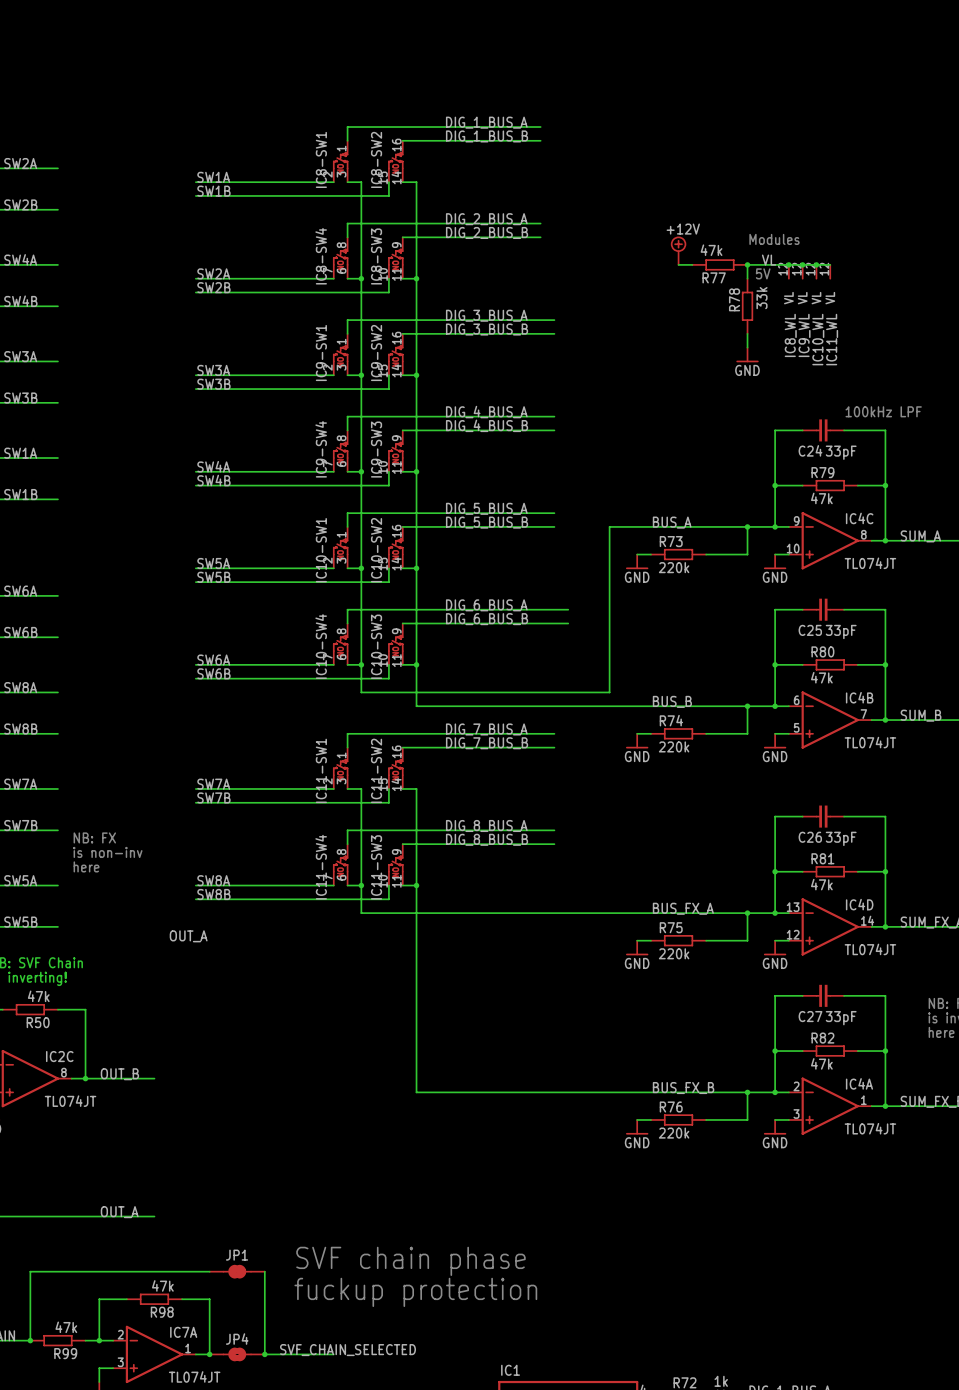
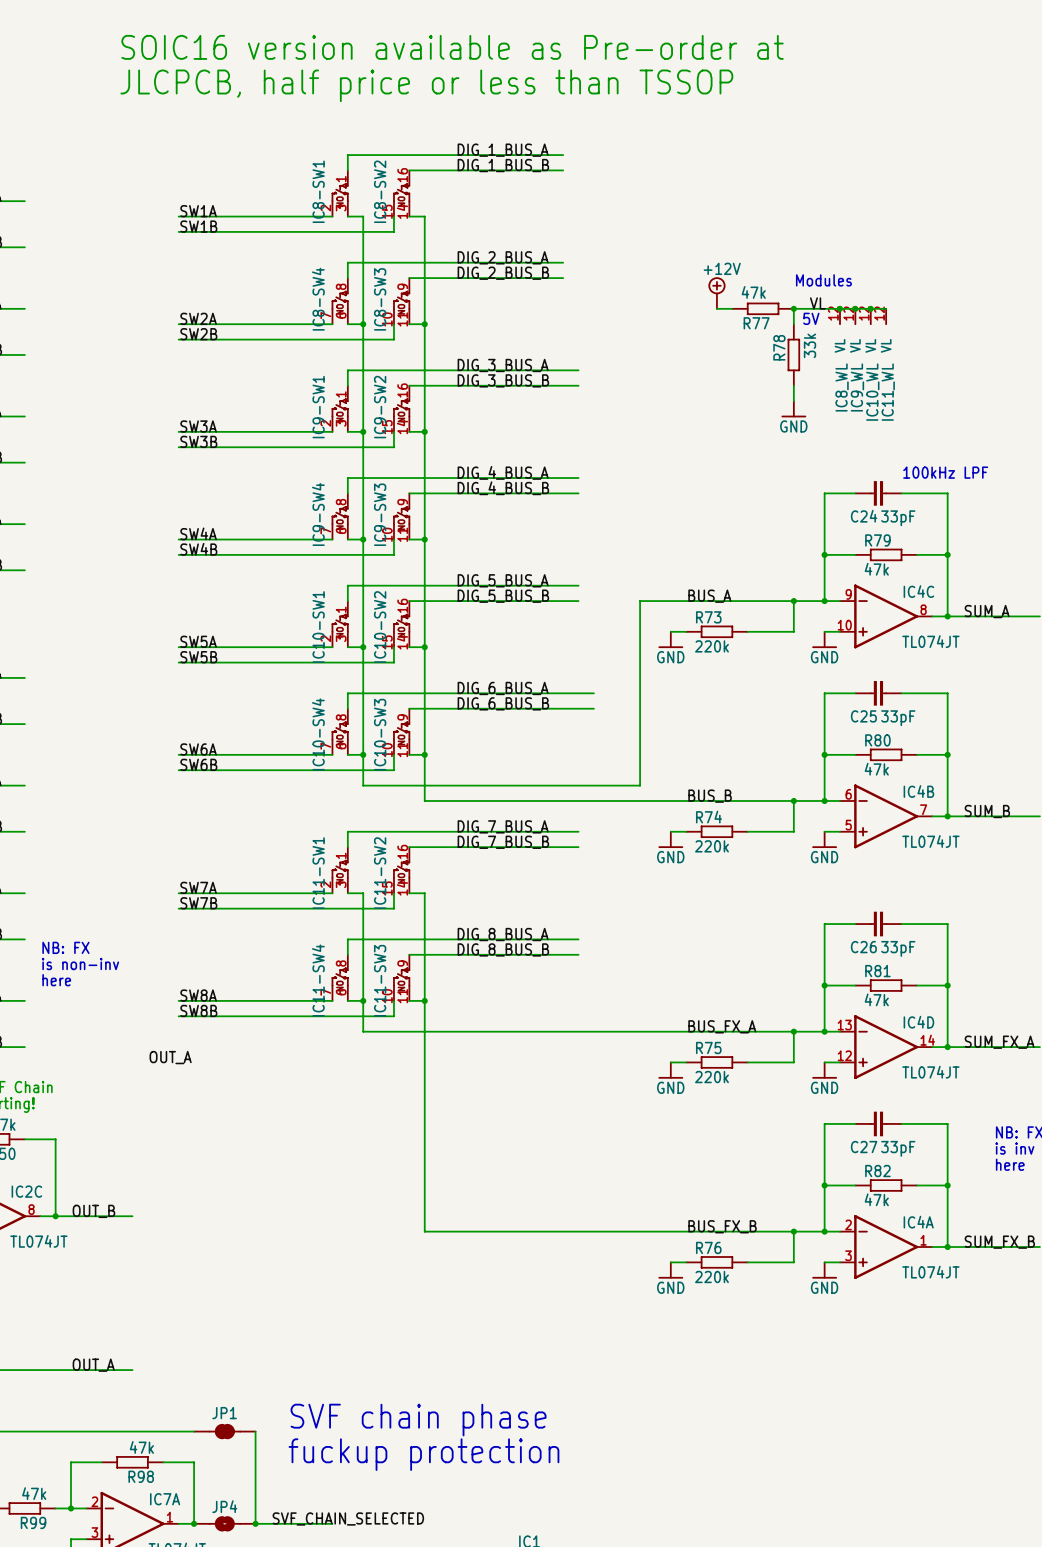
text: none -> SOIC16 version available as Pre-order at (452, 47)
text: none -> JLCPCB, half price or less than TSSOP (426, 85)

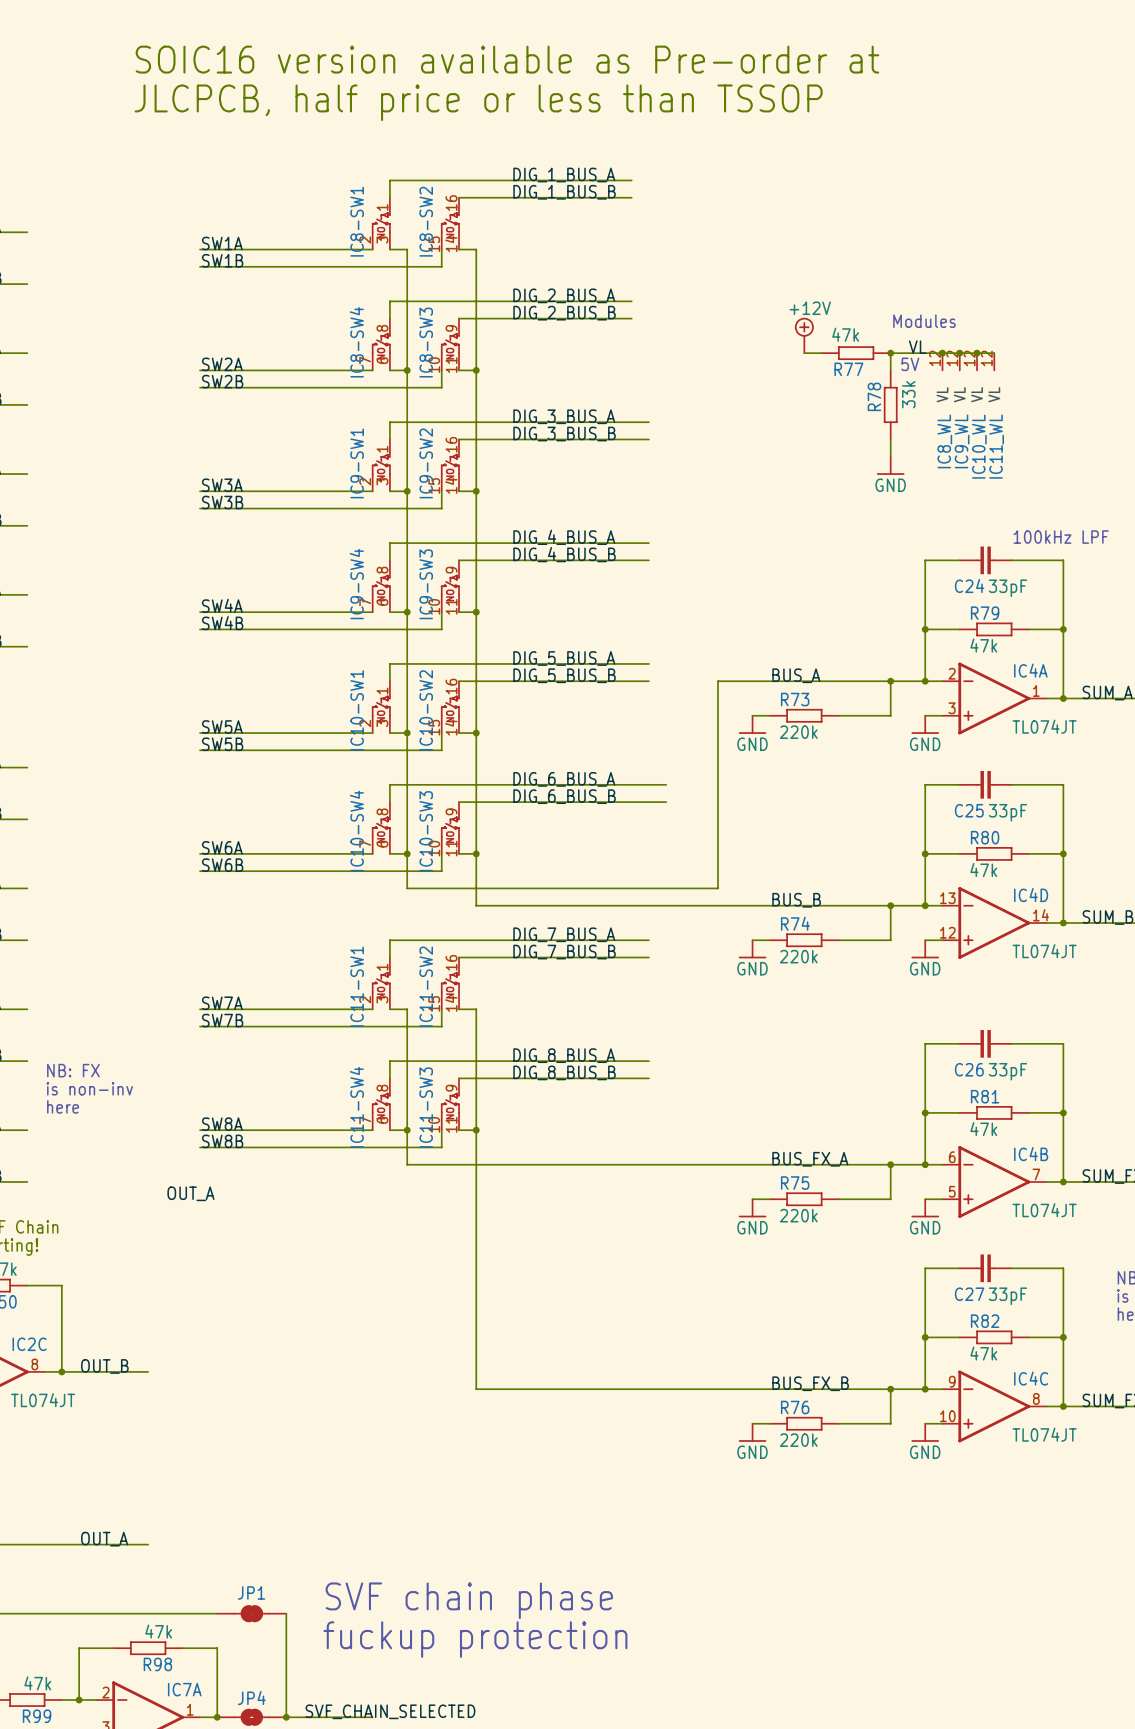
IC4C position: (886, 616) -> (994, 1406)
IC4B position: (886, 816) -> (994, 1181)
IC4D position: (886, 1047) -> (994, 922)
IC4A position: (886, 1247) -> (994, 698)

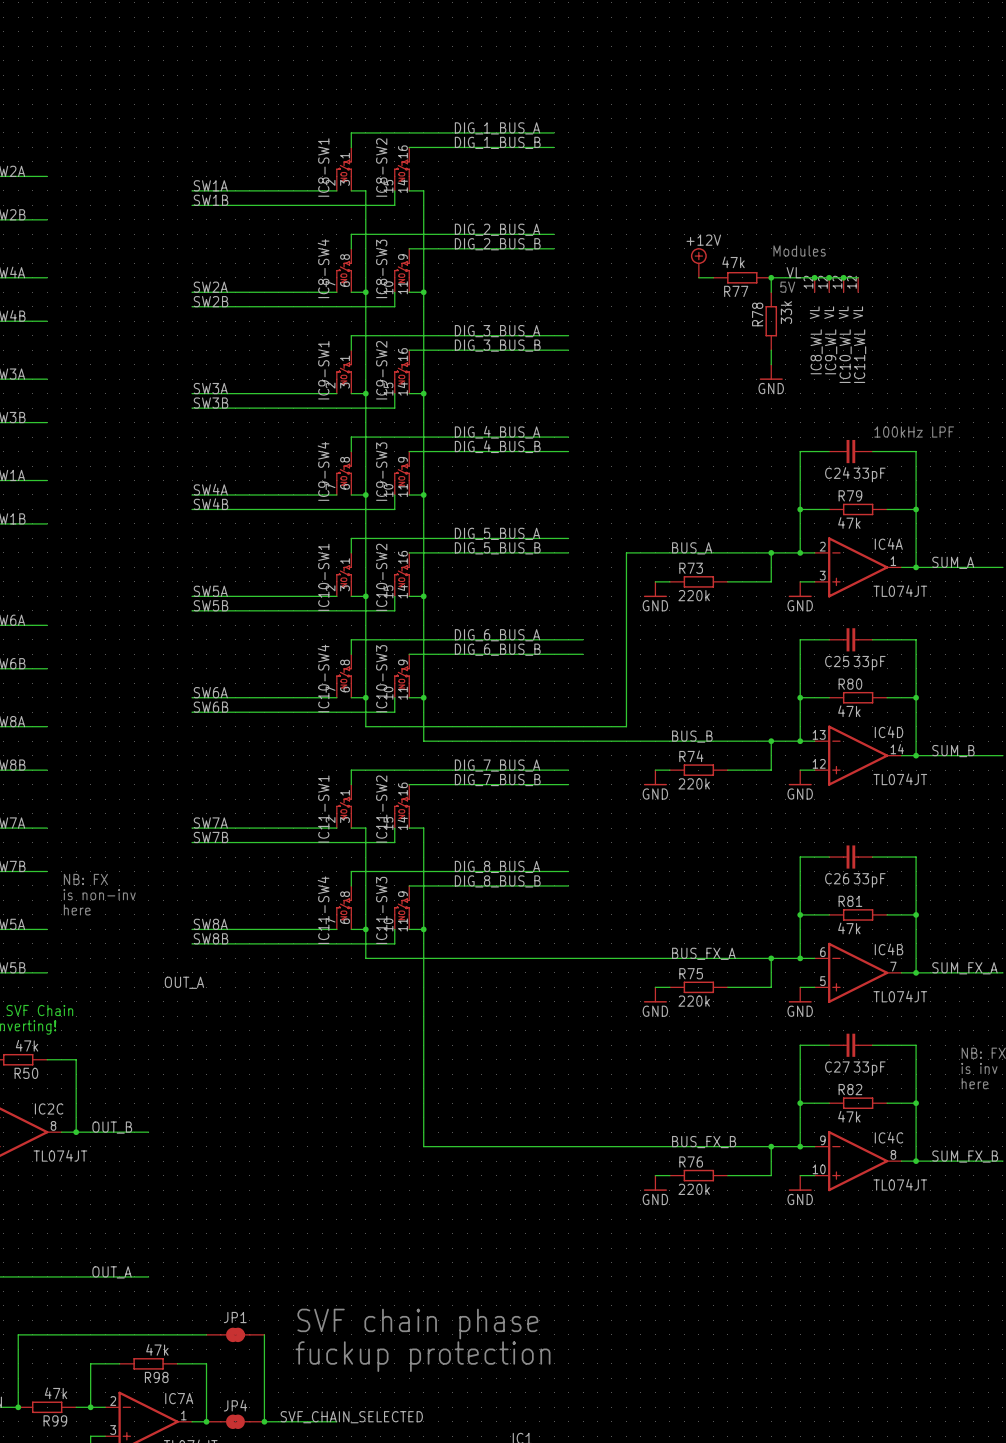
text: SOIC16 version available as Pre-order at (507, 59) -> none
text: JLCPCB, half price or less than TSSOP (478, 102) -> none

